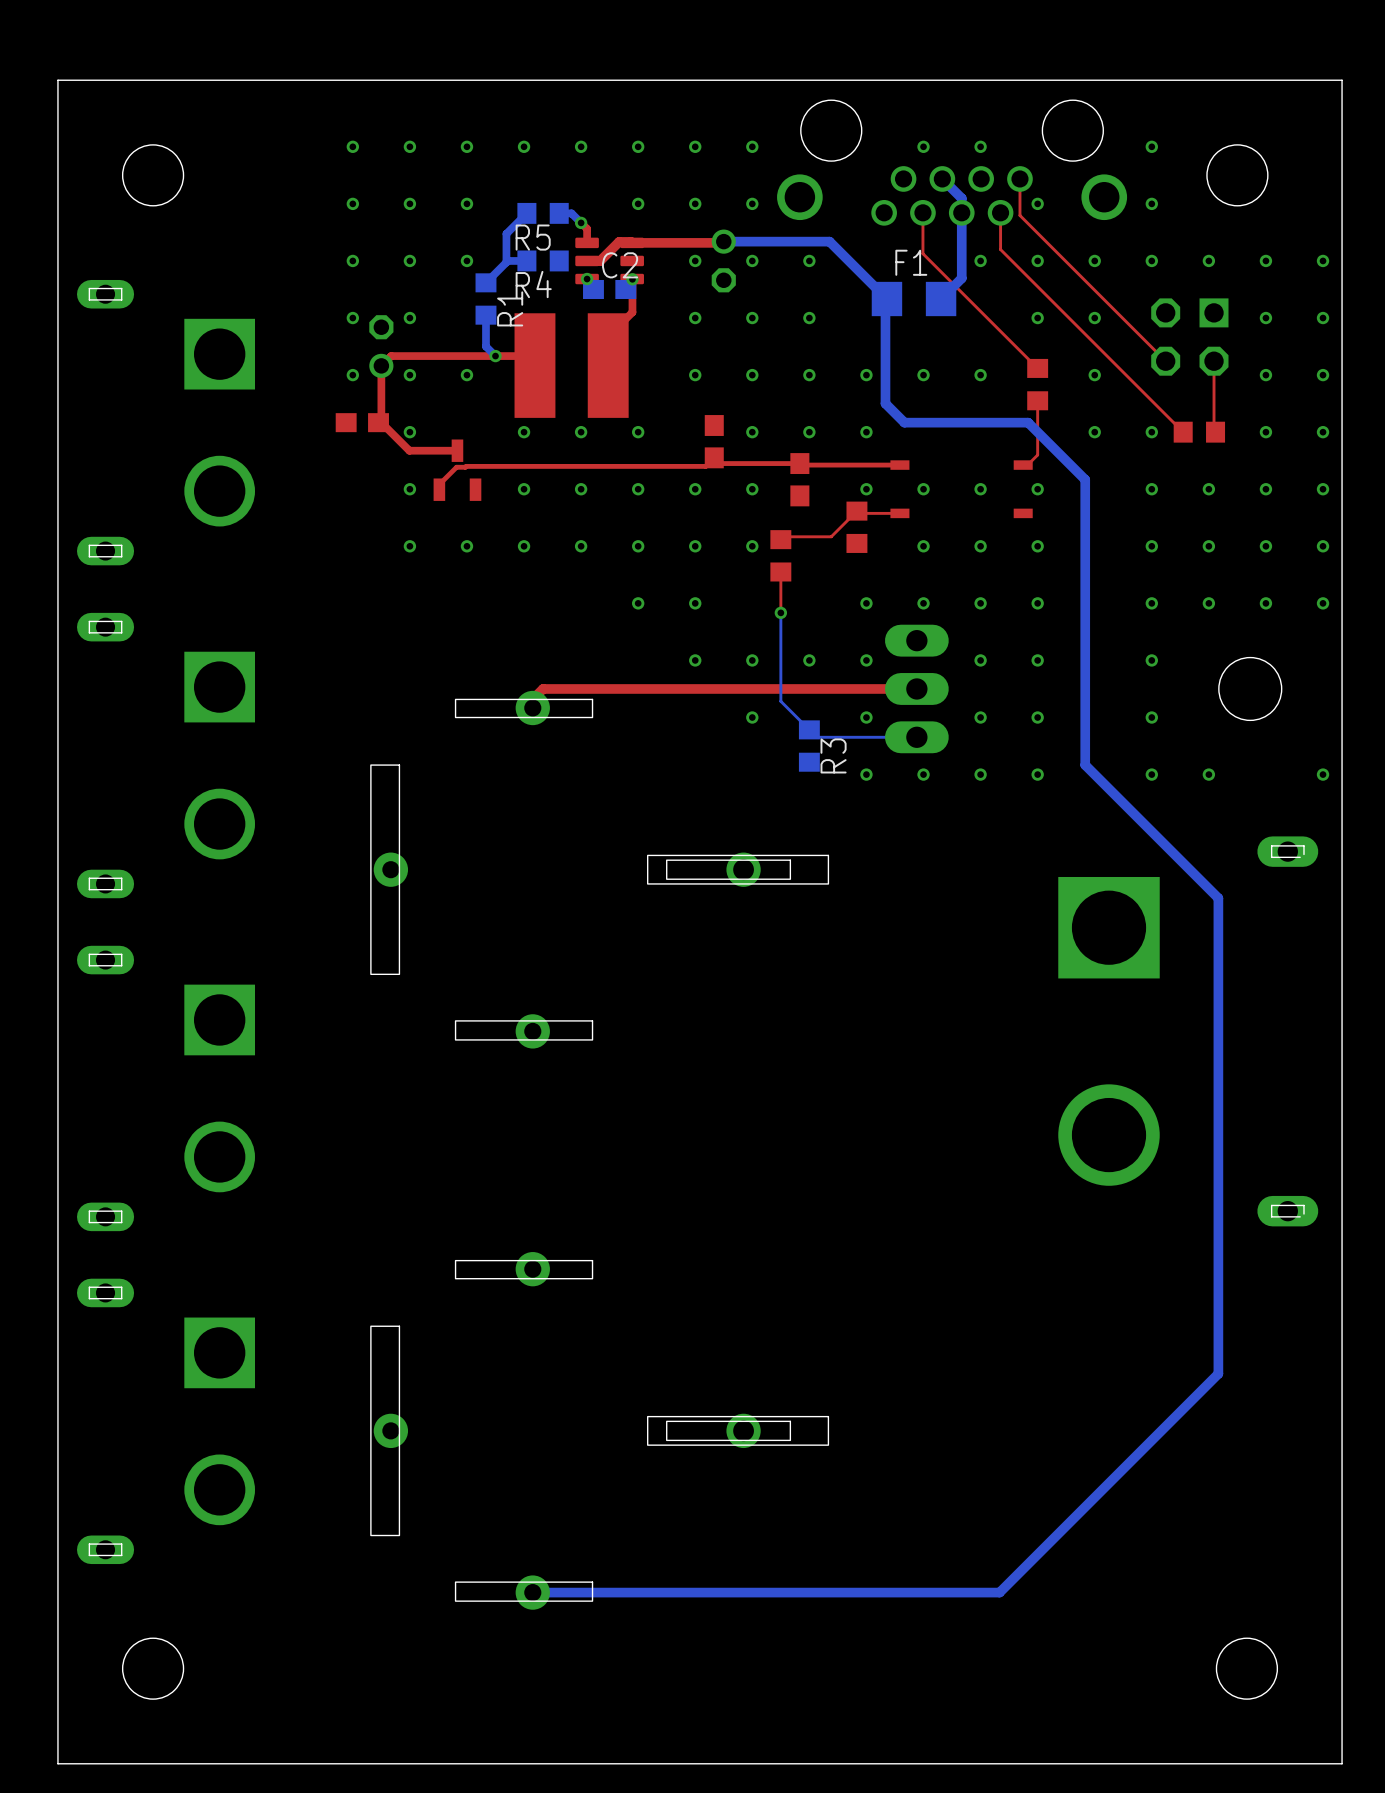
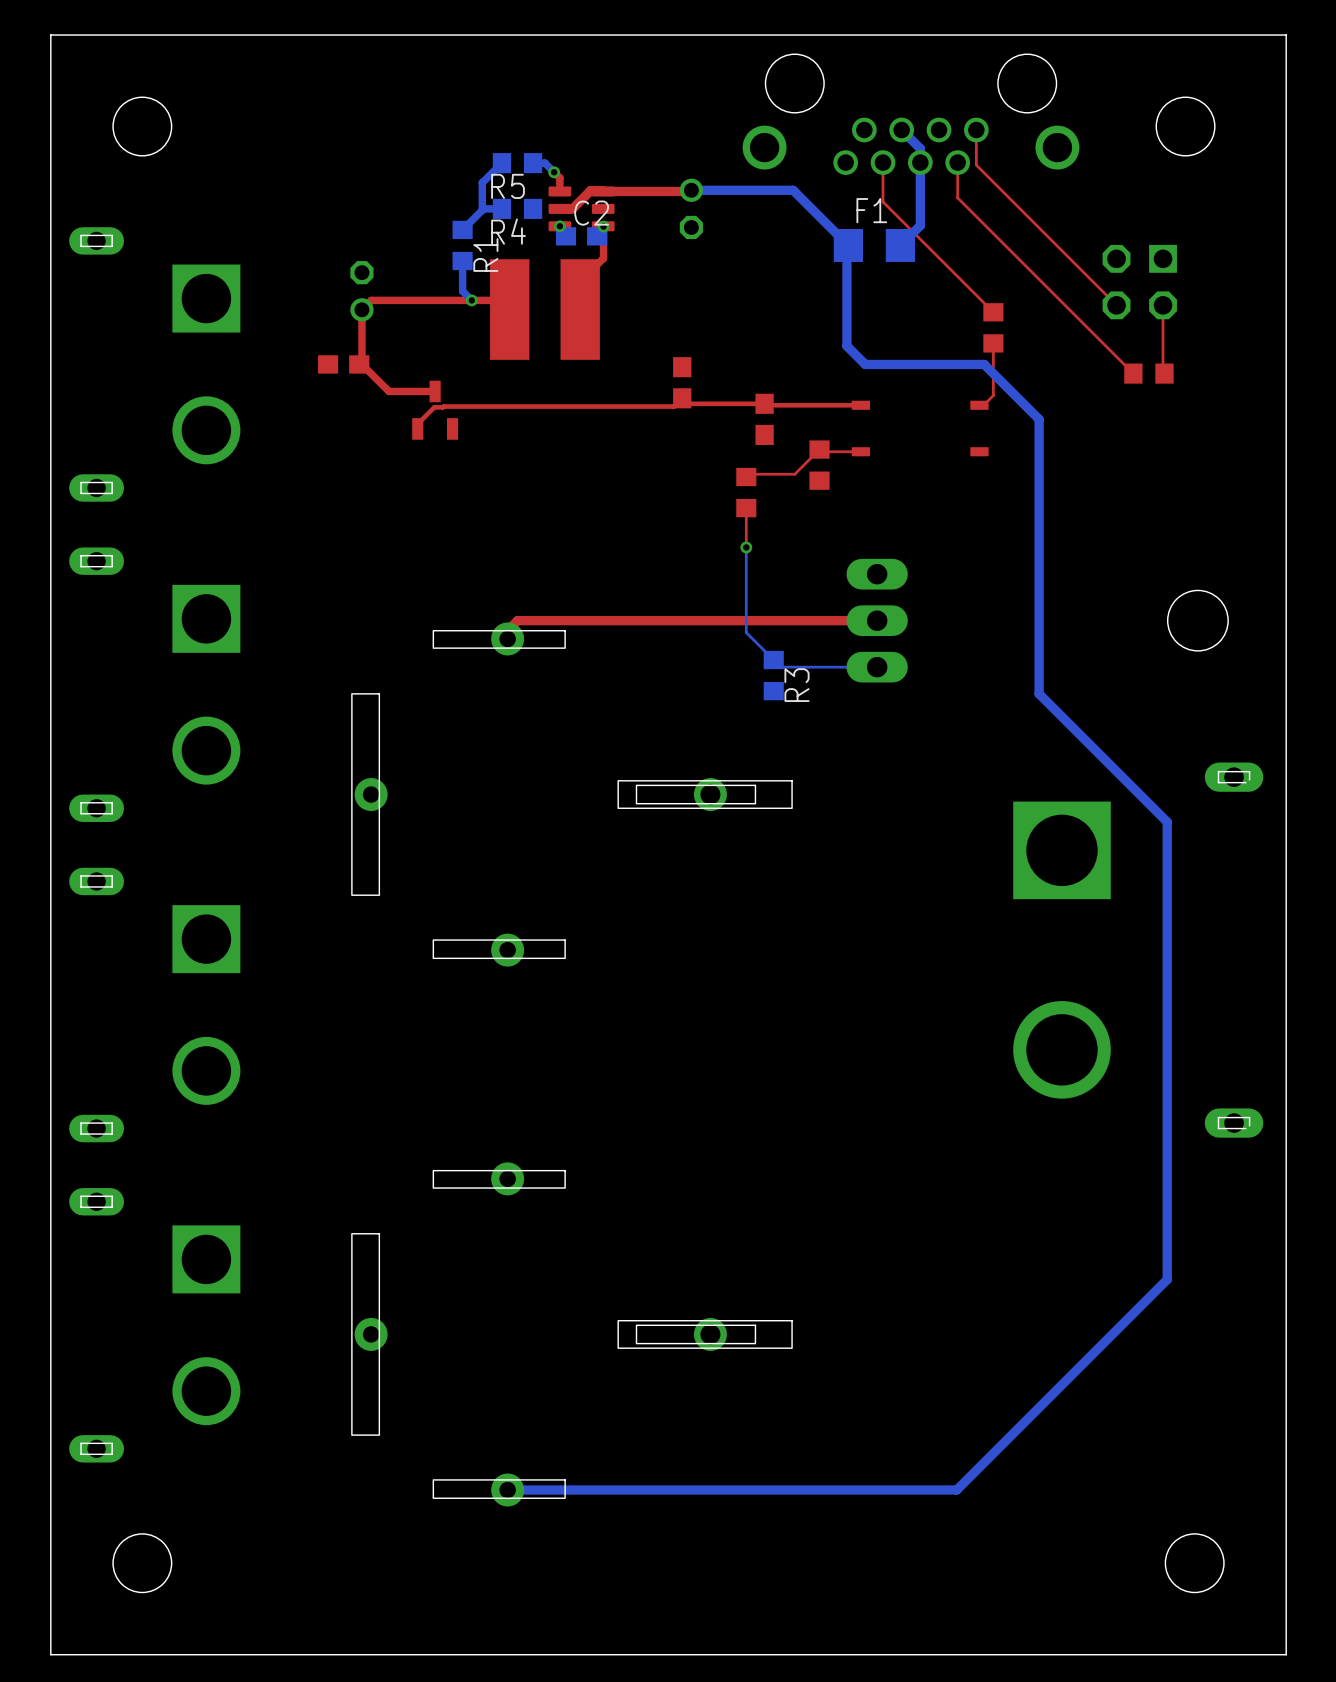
via: (352, 146) -> none
via: (409, 146) -> none
via: (466, 146) -> none
via: (524, 146) -> none
via: (581, 146) -> none
via: (638, 146) -> none
via: (695, 146) -> none
via: (752, 146) -> none
via: (923, 146) -> none
via: (980, 146) -> none
via: (1151, 146) -> none
via: (352, 203) -> none
via: (409, 203) -> none
via: (466, 203) -> none
via: (638, 203) -> none
via: (695, 203) -> none
via: (752, 203) -> none
via: (1037, 203) -> none
via: (1151, 203) -> none
via: (352, 260) -> none
via: (409, 260) -> none
via: (466, 260) -> none
via: (695, 260) -> none
via: (752, 260) -> none
via: (809, 260) -> none
via: (980, 260) -> none
via: (1037, 260) -> none
via: (1094, 260) -> none
via: (1151, 260) -> none
via: (1208, 260) -> none
via: (1265, 260) -> none
via: (1323, 260) -> none
via: (352, 318) -> none
via: (409, 318) -> none
via: (695, 318) -> none
via: (752, 318) -> none
via: (809, 318) -> none
via: (1037, 318) -> none
via: (1094, 318) -> none
via: (1265, 318) -> none
via: (1323, 318) -> none
via: (352, 375) -> none
via: (409, 375) -> none
via: (466, 375) -> none
via: (695, 375) -> none
via: (752, 375) -> none
via: (809, 375) -> none
via: (866, 375) -> none
via: (923, 375) -> none
via: (980, 375) -> none
via: (1094, 375) -> none
via: (1265, 375) -> none
via: (1323, 375) -> none
via: (409, 432) -> none
via: (524, 432) -> none
via: (581, 432) -> none
via: (638, 432) -> none
via: (752, 432) -> none
via: (809, 432) -> none
via: (866, 432) -> none
via: (1094, 432) -> none
via: (1151, 432) -> none
via: (1265, 432) -> none
via: (1323, 432) -> none
via: (409, 489) -> none
via: (524, 489) -> none
via: (581, 489) -> none
via: (638, 489) -> none
via: (695, 489) -> none
via: (752, 489) -> none
via: (866, 489) -> none
via: (923, 489) -> none
via: (980, 489) -> none
via: (1037, 489) -> none
via: (1151, 489) -> none
via: (1208, 489) -> none
via: (1265, 489) -> none
via: (1323, 489) -> none
via: (409, 546) -> none
via: (466, 546) -> none
via: (524, 546) -> none
via: (581, 546) -> none
via: (638, 546) -> none
via: (695, 546) -> none
via: (752, 546) -> none
via: (923, 546) -> none
via: (980, 546) -> none
via: (1037, 546) -> none
via: (1151, 546) -> none
via: (1208, 546) -> none
via: (1265, 546) -> none
via: (1323, 546) -> none
via: (638, 603) -> none
via: (695, 603) -> none
via: (866, 603) -> none
via: (923, 603) -> none
via: (980, 603) -> none
via: (1037, 603) -> none
via: (1151, 603) -> none
via: (1208, 603) -> none
via: (1265, 603) -> none
via: (1323, 603) -> none
via: (695, 660) -> none
via: (752, 660) -> none
via: (809, 660) -> none
via: (866, 660) -> none
via: (980, 660) -> none
via: (1037, 660) -> none
via: (1151, 660) -> none
via: (752, 717) -> none
via: (866, 717) -> none
via: (980, 717) -> none
via: (1037, 717) -> none
via: (1151, 717) -> none
via: (866, 774) -> none
via: (923, 774) -> none
via: (980, 774) -> none
via: (1037, 774) -> none
via: (1151, 774) -> none
via: (1208, 774) -> none
via: (1323, 774) -> none

